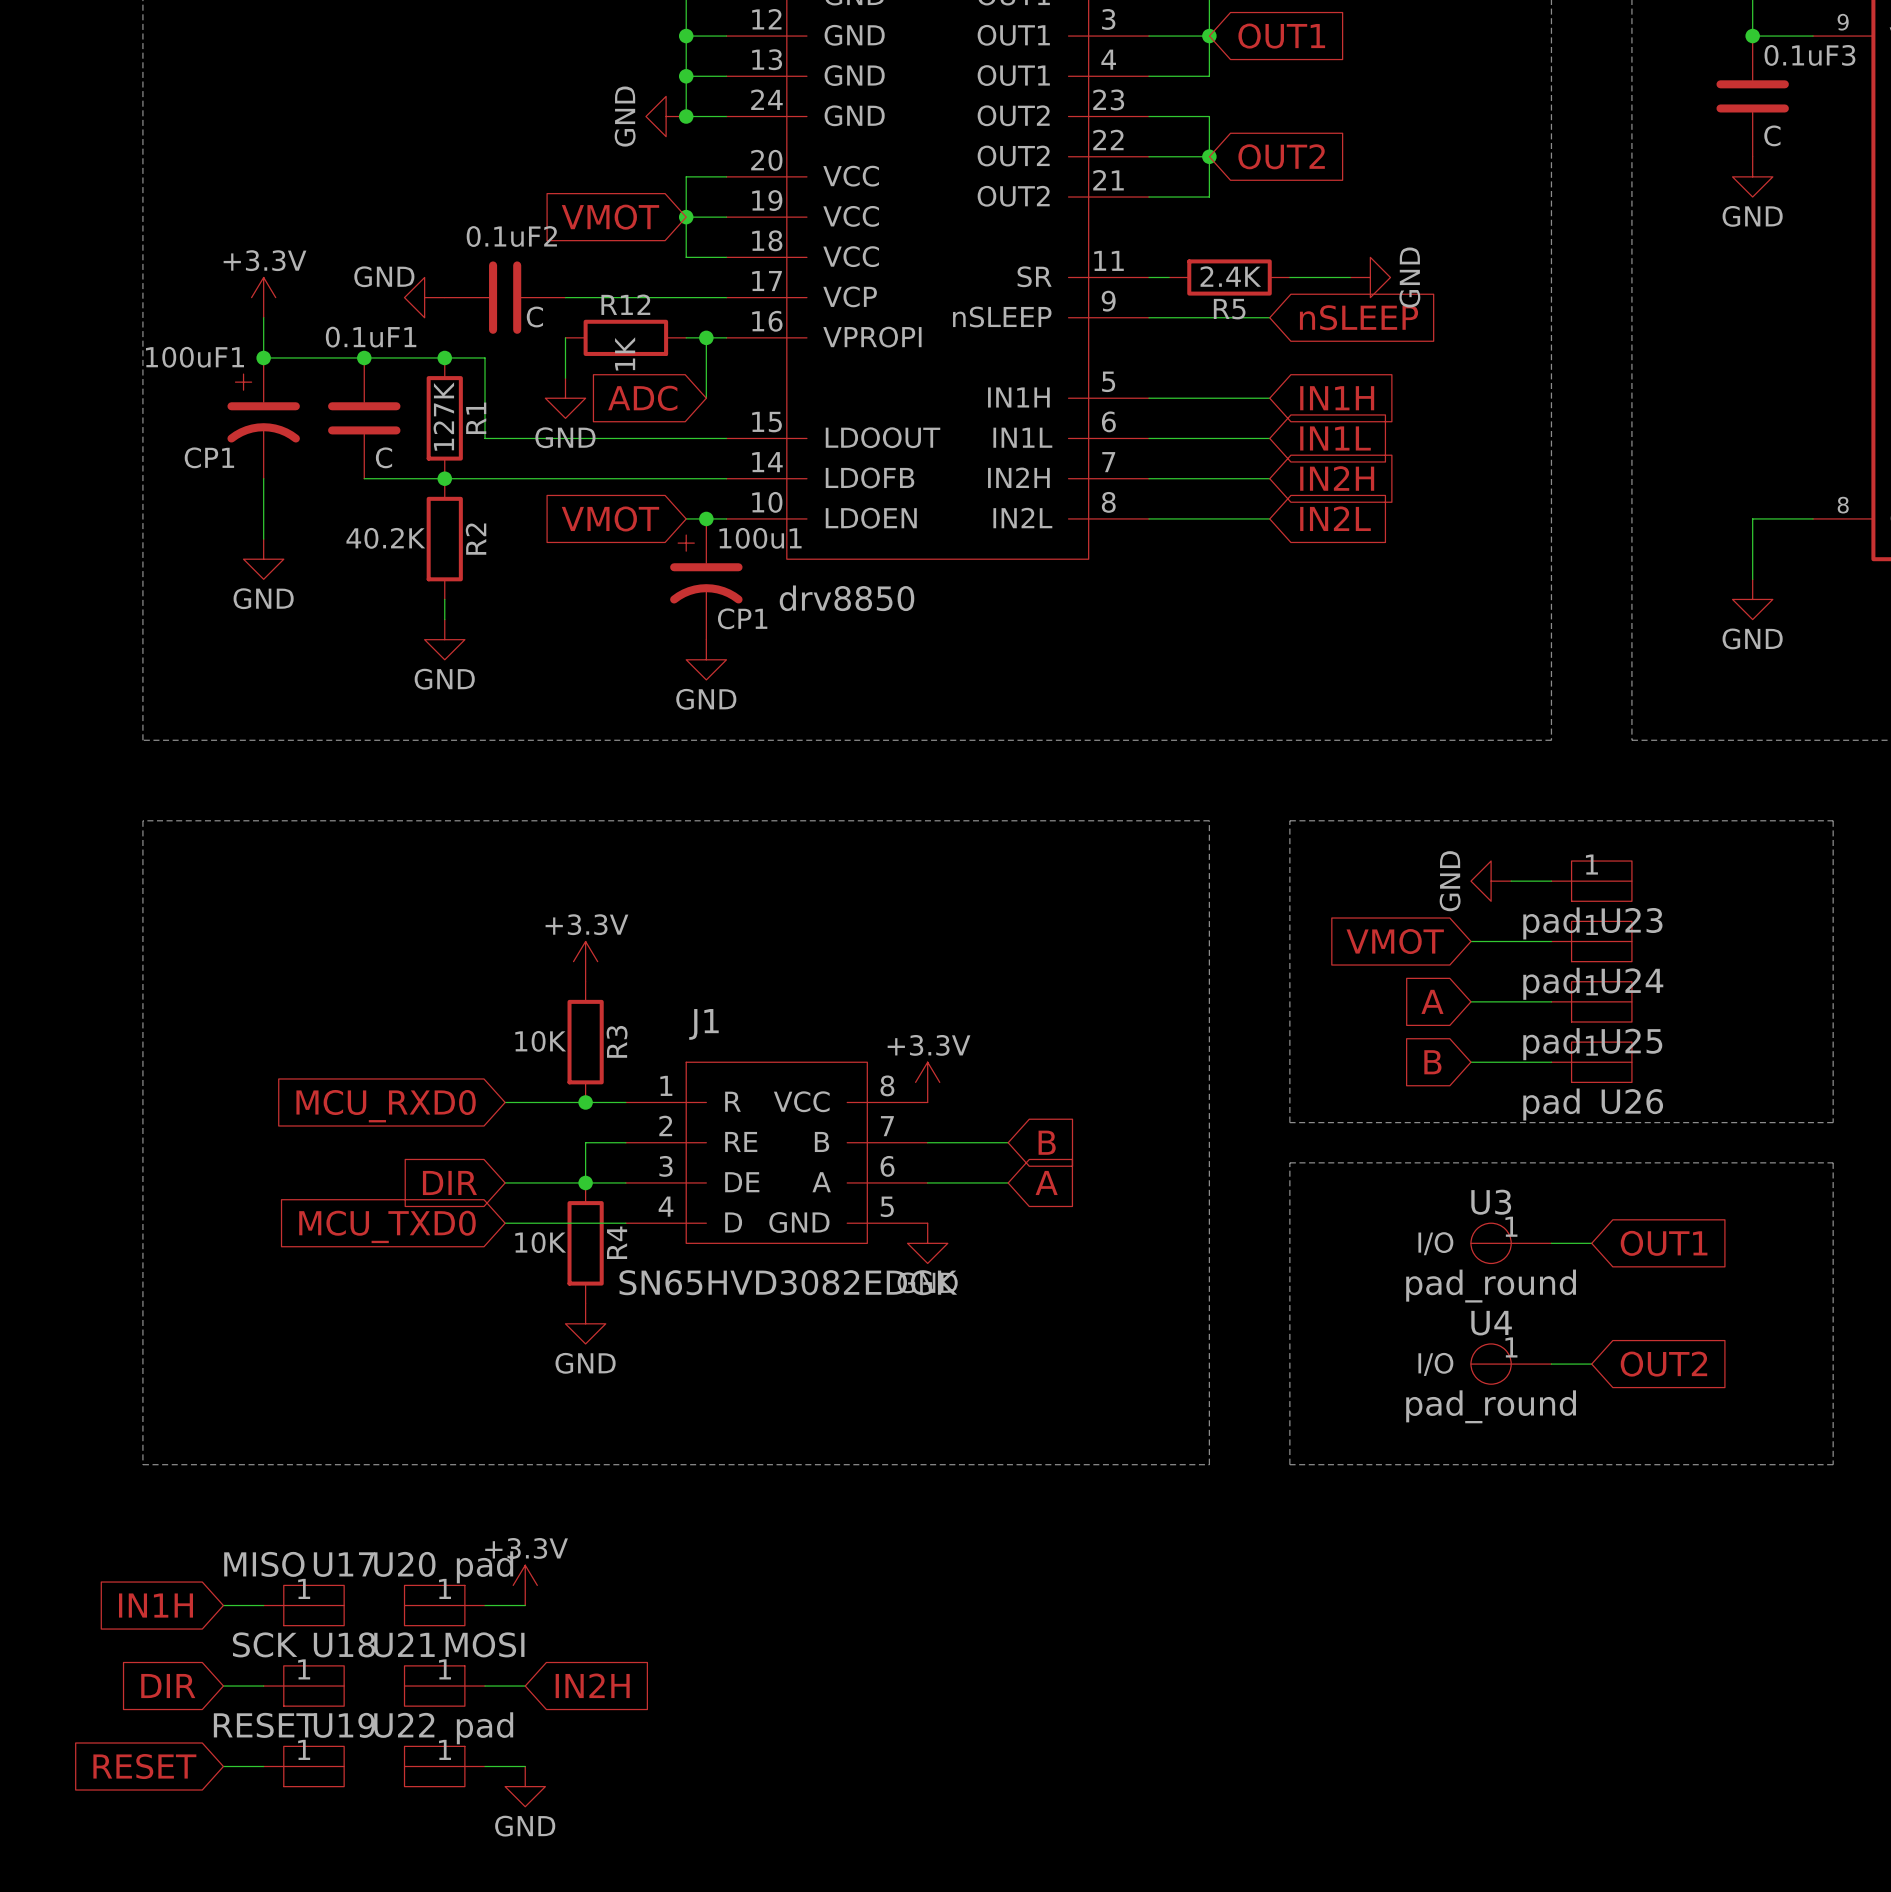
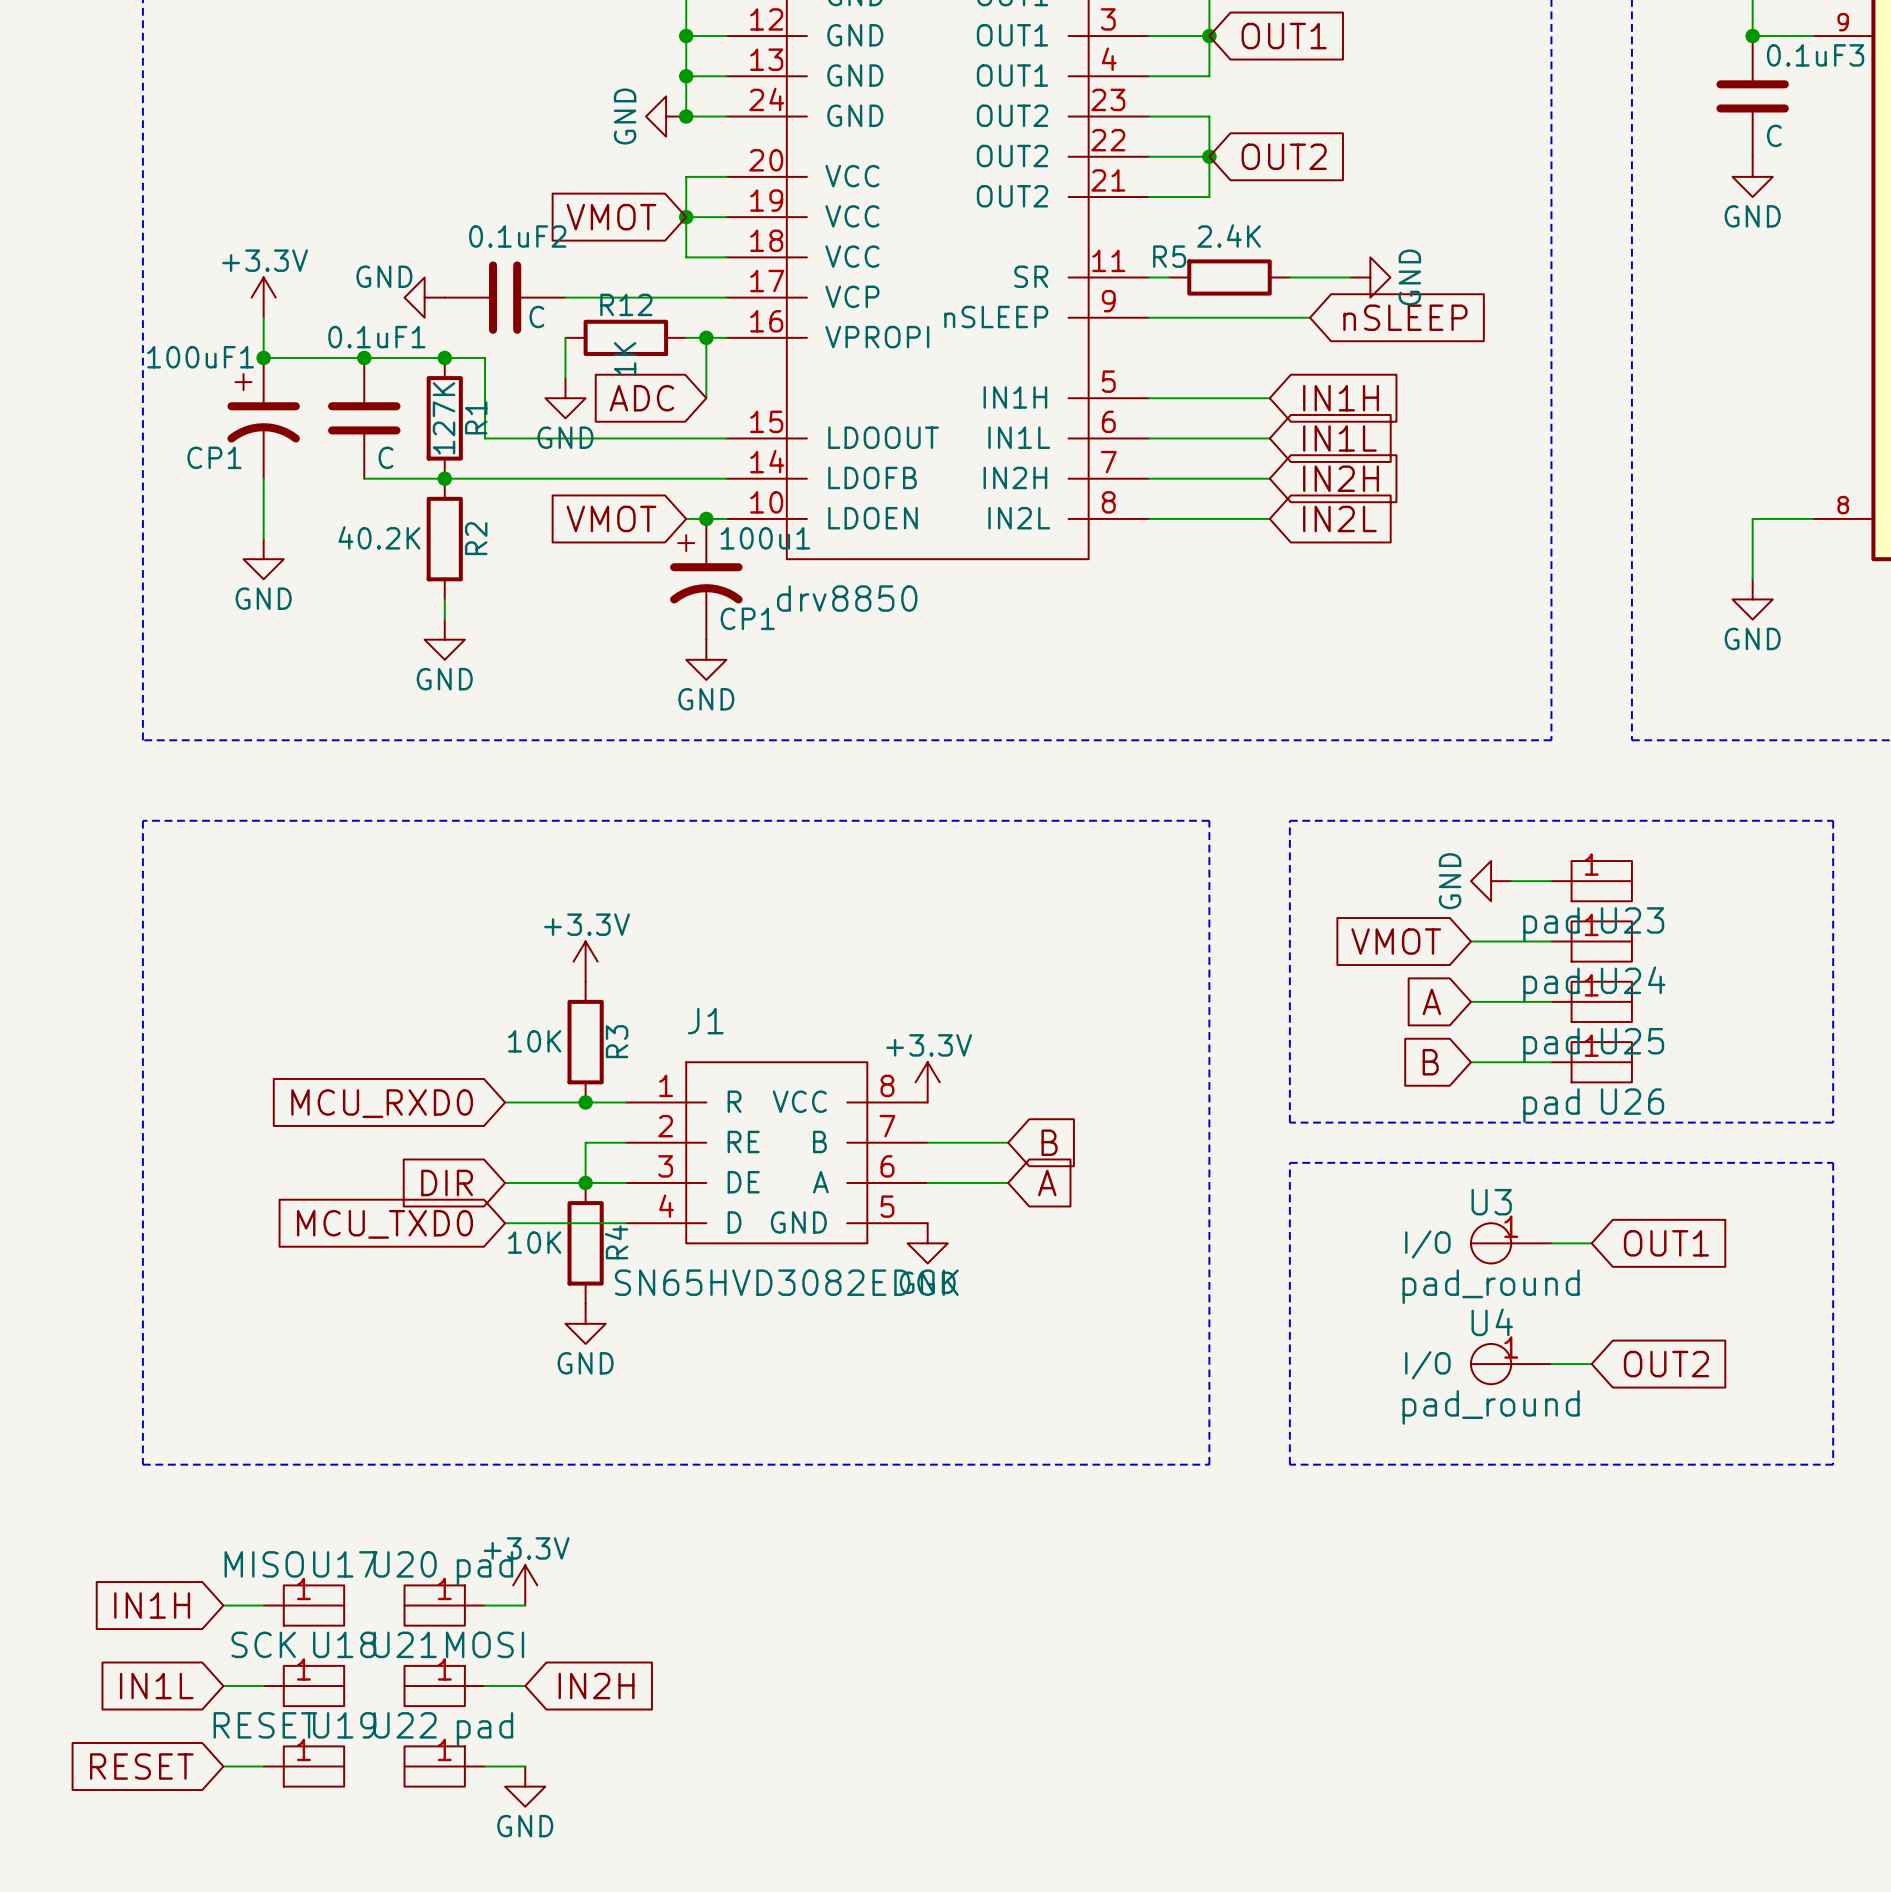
R5 value position: 2.4K (1230, 276) -> 2.4K (1229, 236)
R5 name position: R5 (1229, 309) -> R5 (1169, 256)
wire: none -> (1269, 317) (1309, 317)
global label position: nSLEEP (1359, 317) -> nSLEEP (1405, 317)
global label: DIR (168, 1686) -> IN1L (156, 1686)

